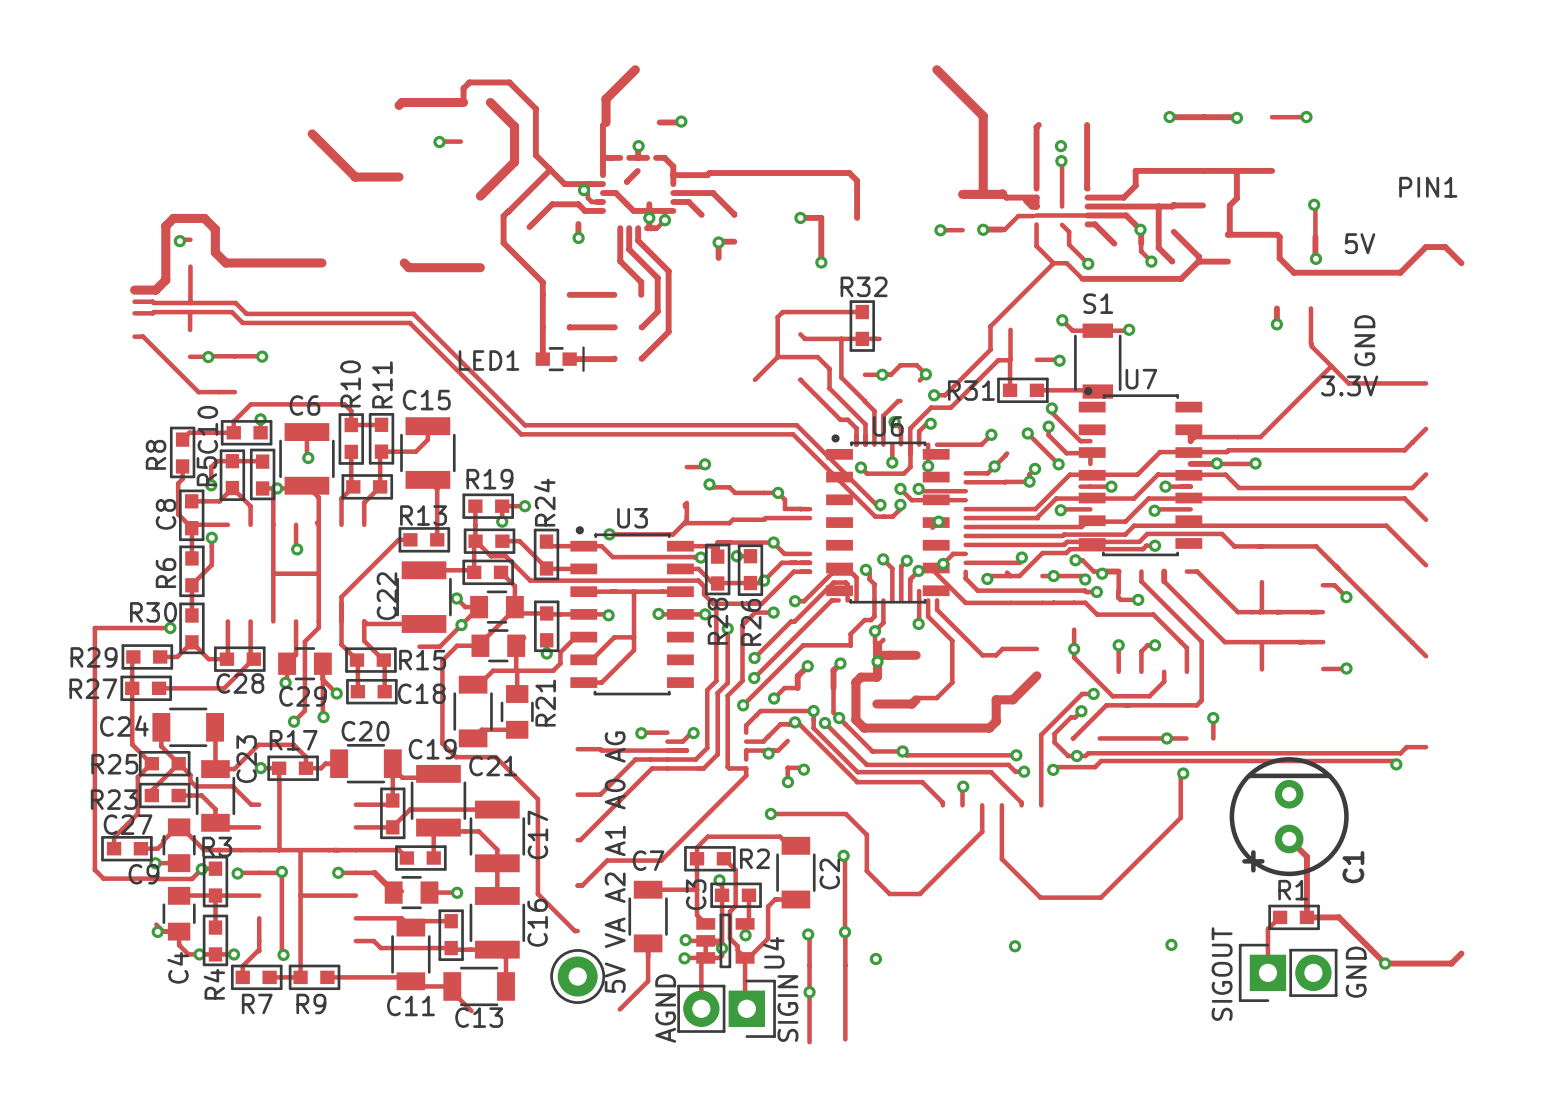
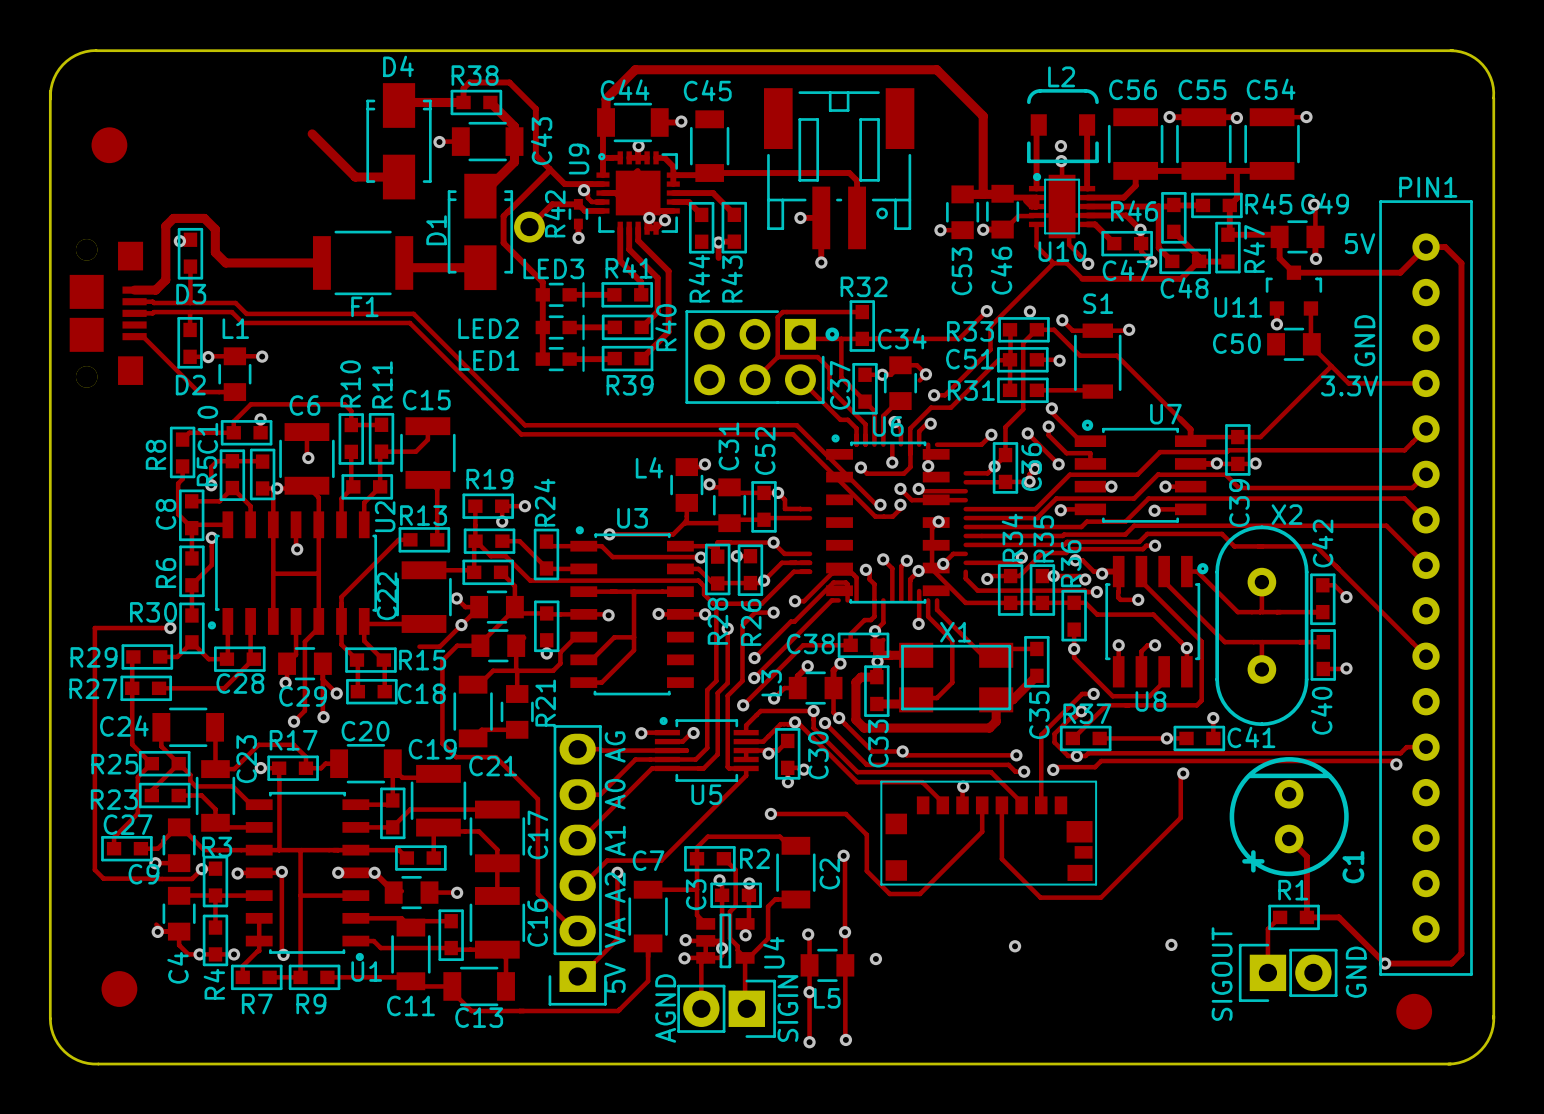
board edge: none -> (96, 50) (75, 55) (62, 64) (52, 83) (50, 99)
board edge: none -> (96, 50) (1452, 50)
board edge: none -> (1450, 50) (1470, 55) (1482, 64) (1490, 77) (1493, 97)
track: none -> (635, 69) (936, 69)
board edge: none -> (50, 91) (50, 1018) (55, 1038) (68, 1055) (77, 1060) (93, 1064) (1450, 1064)
board edge: none -> (1493, 97) (1493, 1018)
R38: none -> (476, 102)
C44: none -> (632, 122)
L2: none -> (1062, 126)
D4: none -> (399, 141)
C43: none -> (487, 141)
C56: none -> (1135, 144)
C55: none -> (1203, 144)
C54: none -> (1272, 144)
part: none -> (109, 145)
C45: none -> (709, 146)
part: none -> (839, 168)
U9: none -> (638, 193)
U10: none -> (1062, 205)
R45: none -> (1216, 205)
C46: none -> (1002, 211)
C53: none -> (962, 212)
R42: none -> (578, 214)
R46: none -> (1173, 217)
part: none -> (529, 227)
R44: none -> (701, 227)
R43: none -> (734, 227)
D1: none -> (480, 231)
C49: none -> (1297, 236)
C47: none -> (1127, 243)
R47: none -> (1227, 247)
D2: none -> (190, 253)
C48: none -> (1185, 261)
F1: none -> (363, 262)
track: none -> (1461, 263) (1461, 953)
U11: none -> (1293, 290)
LED3: none -> (560, 294)
R41: none -> (627, 294)
track: none -> (986, 311) (959, 338) (879, 338)
via: none -> (986, 311)
via: none -> (1029, 311)
part: none -> (108, 313)
LED2: none -> (560, 327)
R40: none -> (627, 327)
R33: none -> (1024, 329)
D3: none -> (190, 342)
C50: none -> (1293, 344)
part: none -> (762, 357)
R39: none -> (627, 358)
C51: none -> (1022, 359)
L1: none -> (234, 374)
U7 name position: U7 (1141, 379) -> U7 (1165, 414)
C34: none -> (900, 383)
U7 footprint: [1078, 387, 1203, 557] -> [1074, 419, 1207, 523]
C37: none -> (865, 388)
track: none -> (1190, 429) (1116, 355) (1080, 355) (1054, 329) (1036, 329) (1023, 342) (1023, 409) (1005, 427) (1005, 455)
C39: none -> (1237, 449)
C36: none -> (1005, 467)
L4: none -> (686, 485)
C31: none -> (729, 505)
C52: none -> (764, 506)
track: none -> (932, 527) (932, 569)
U2: none -> (292, 573)
part: none -> (1426, 588)
R34: none -> (1010, 590)
R35: none -> (1042, 590)
C42: none -> (1322, 599)
R36: none -> (1074, 615)
U8: none -> (1156, 621)
X2: none -> (1261, 625)
C38: none -> (863, 645)
via: none -> (1186, 648)
C40: none -> (1323, 654)
C35: none -> (1036, 661)
X1: none -> (956, 677)
L3: none -> (815, 688)
C33: none -> (876, 691)
R37: none -> (1085, 738)
C41: none -> (1199, 738)
U5: none -> (706, 749)
C30: none -> (787, 753)
part: none -> (988, 833)
part: none -> (577, 865)
via: none -> (374, 872)
track: none -> (617, 872) (617, 939) (580, 976)
via: none -> (617, 872)
U1: none -> (307, 876)
via: none -> (749, 883)
L5: none -> (827, 965)
part: (577, 976) -> none
part: none -> (119, 989)
track: none -> (619, 1009) (618, 1011) (471, 1011)
part: none -> (1414, 1011)
board edge: none -> (1493, 1016) (1491, 1031) (1481, 1049) (1468, 1059) (1448, 1064)
via: none -> (845, 1039)
via: none -> (809, 1042)

